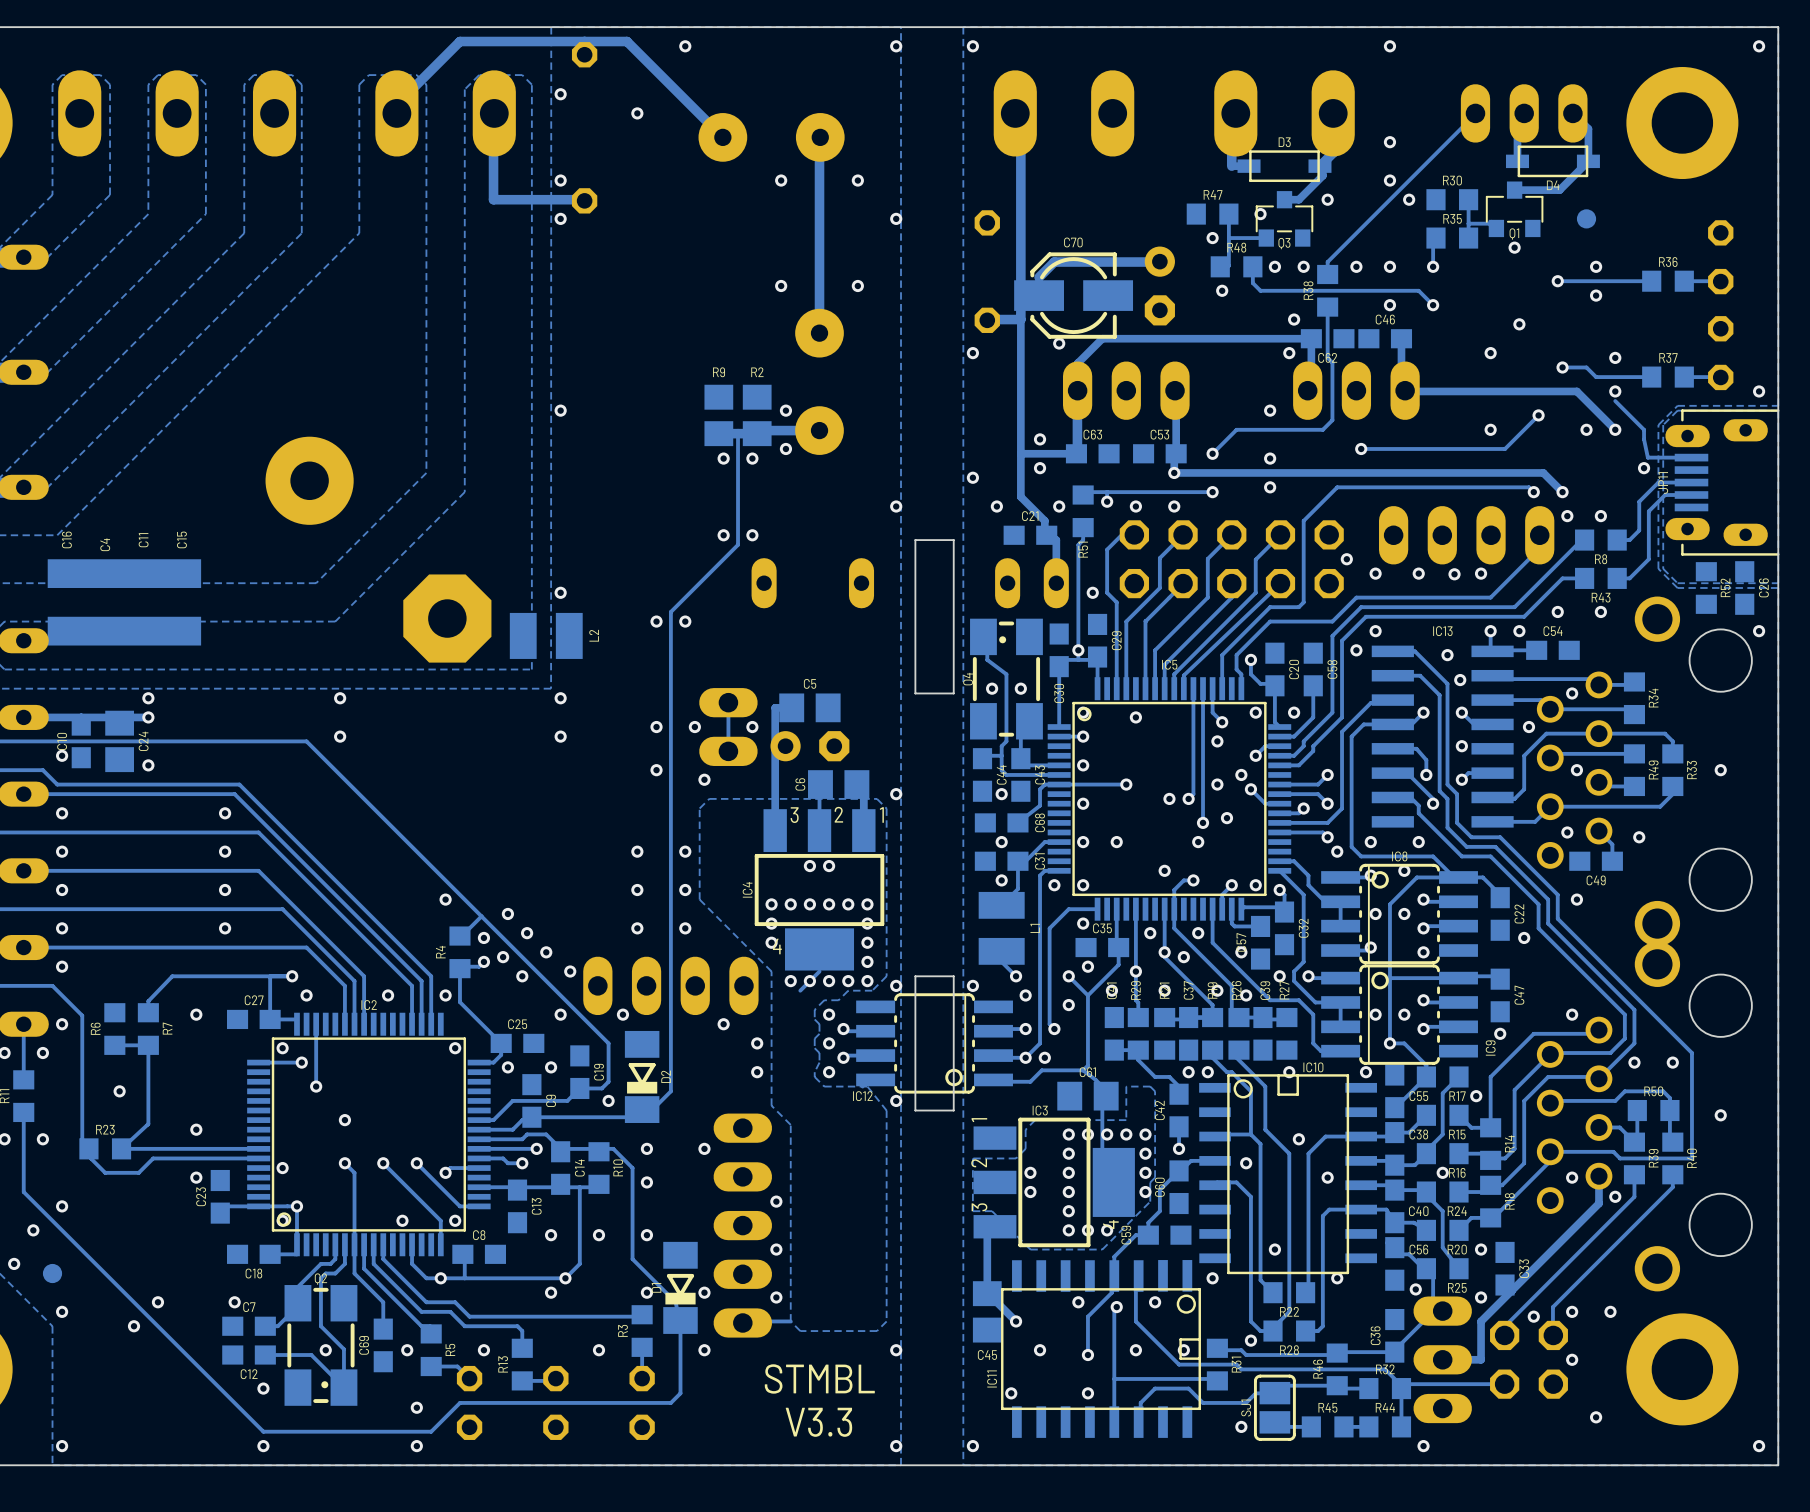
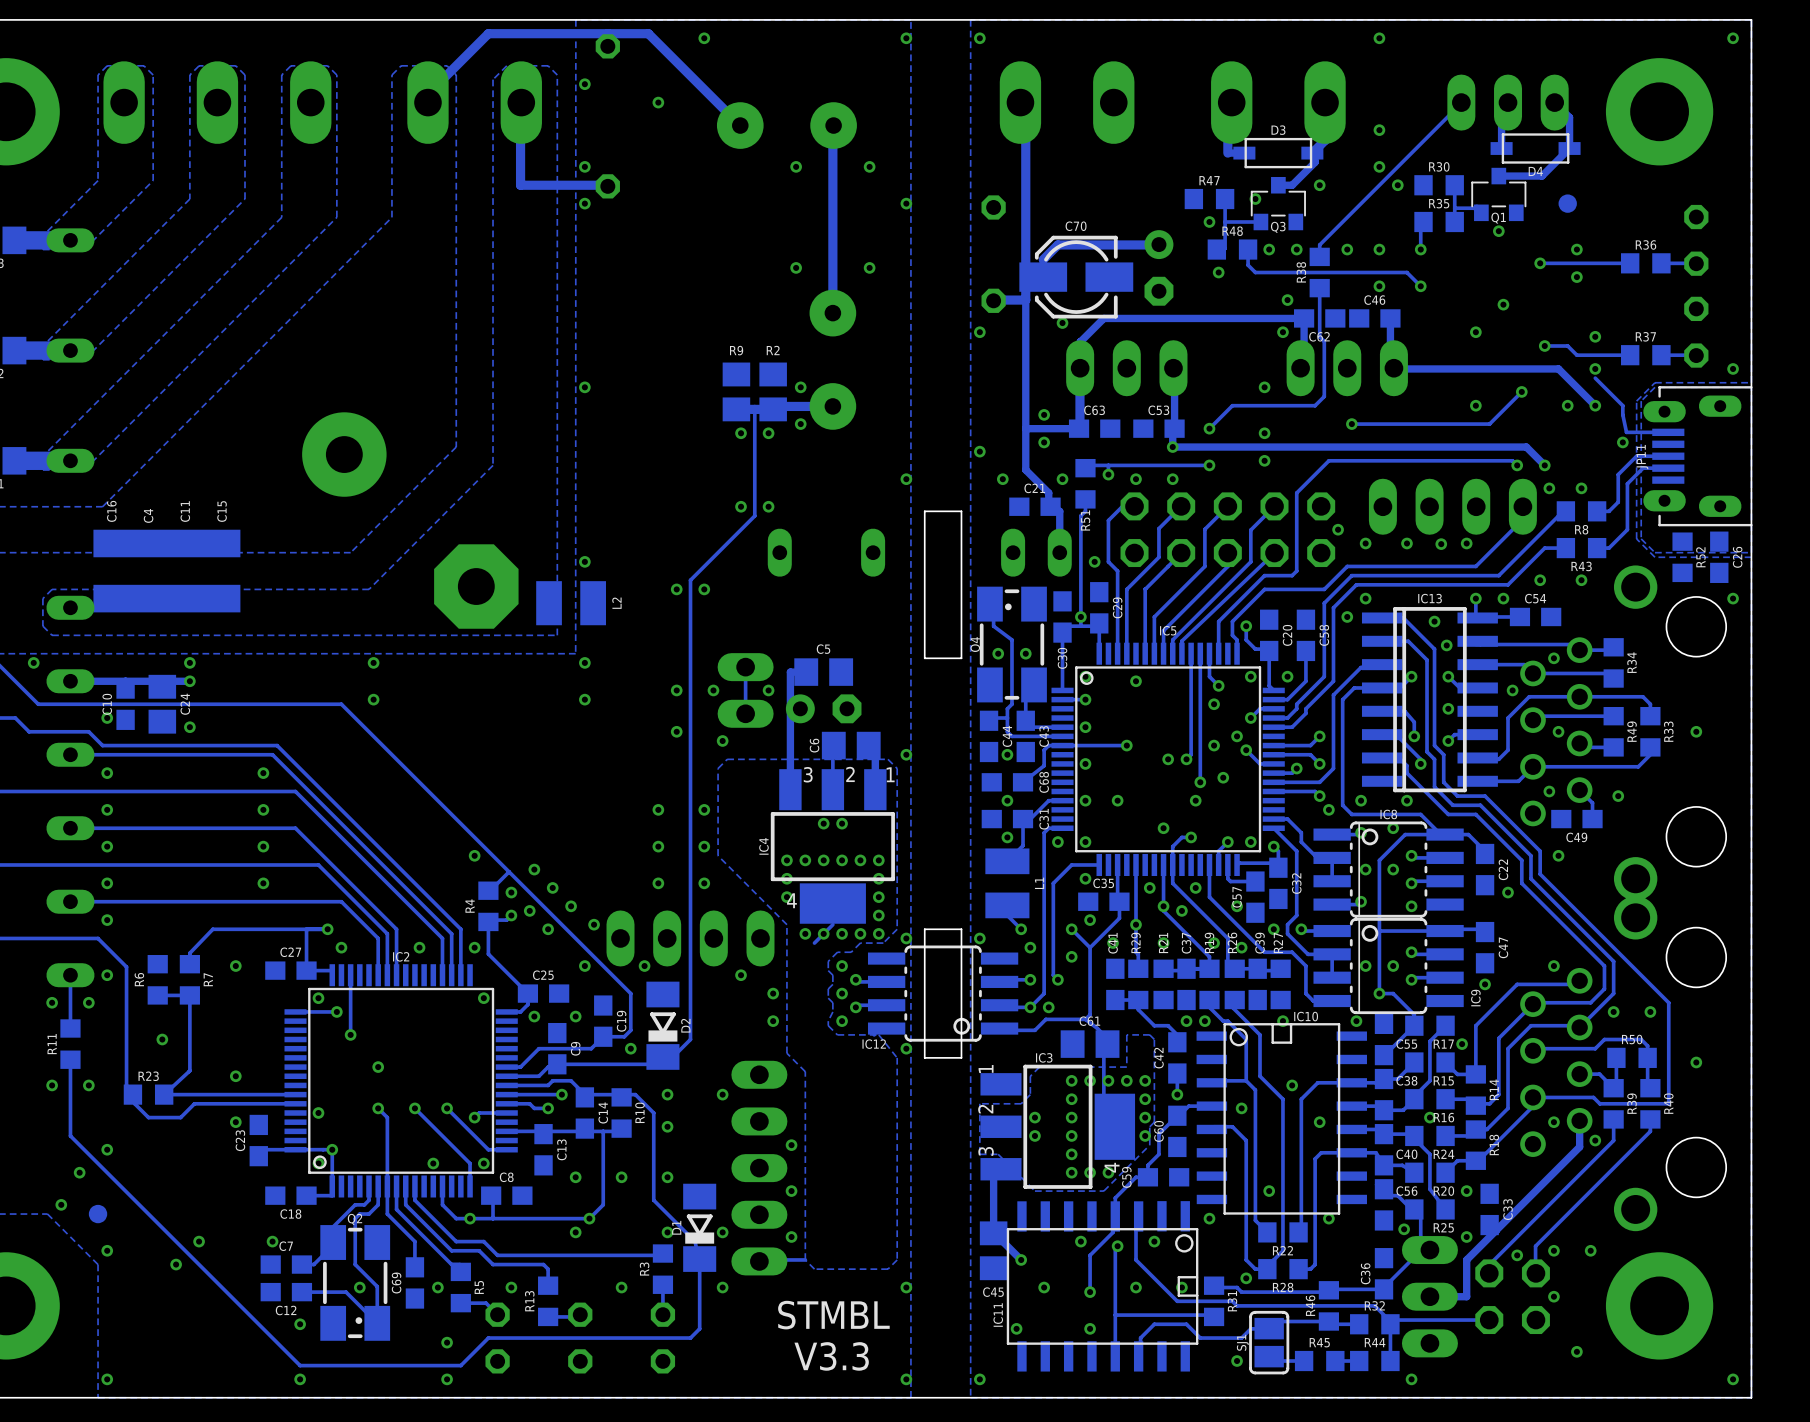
IC13 footprint: [1371, 645, 1514, 828] -> [1361, 607, 1498, 793]

